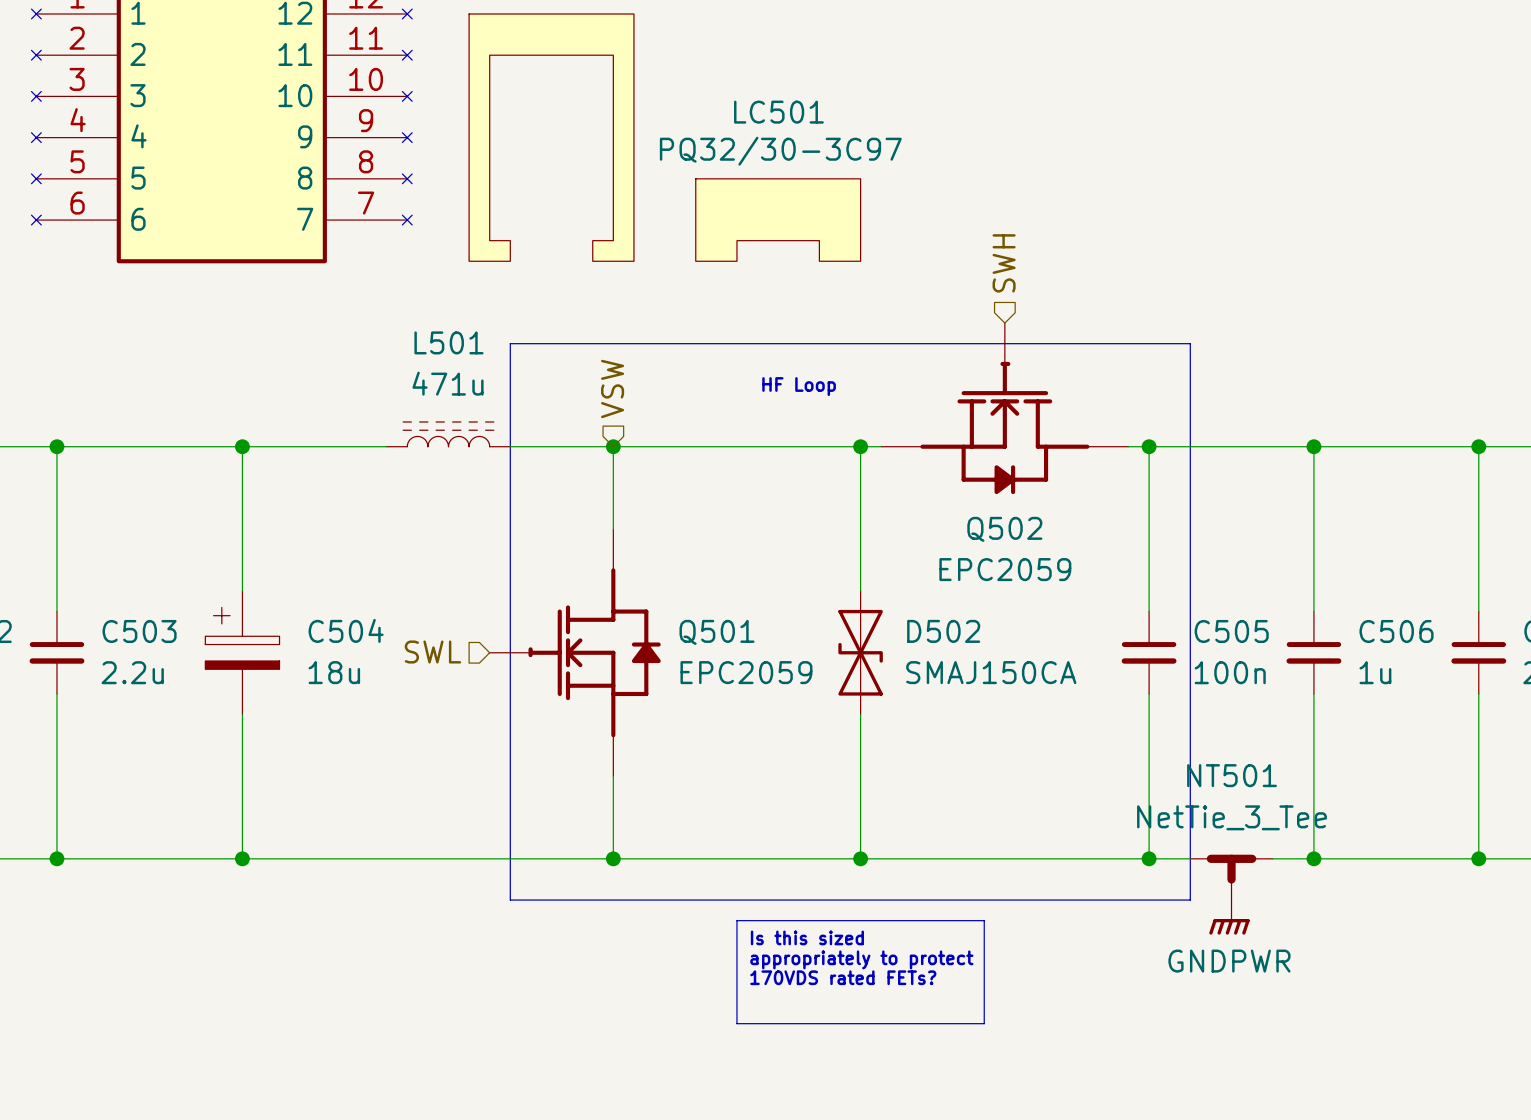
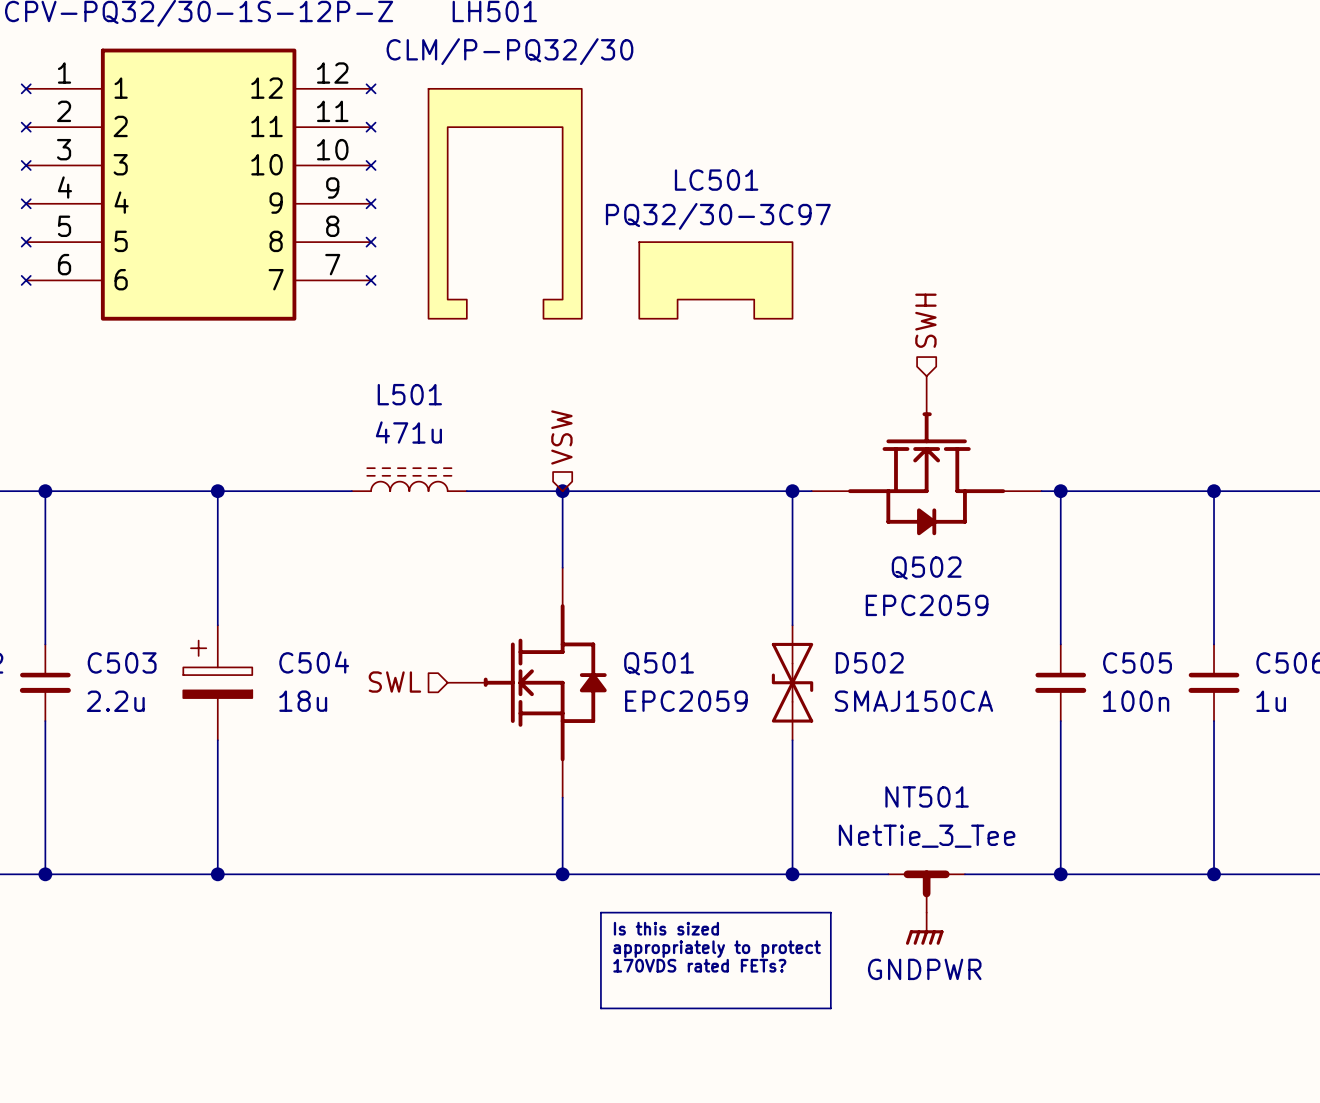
text: HF Loop (799, 386) -> none
NT501 position: (1231, 878) -> (926, 892)
line: (654, 900) (510, 900) (510, 343) (1190, 343) (1190, 900) (901, 900) -> (600, 912) (600, 1008) (830, 1008) (830, 912)
power symbol position: GNDPWR (1229, 917) -> GNDPWR (924, 928)
line: (736, 920) (984, 920) (984, 1023) (736, 1023) (736, 920) -> none
text position: Is this sized (807, 937) -> Is this sized (666, 928)
text position: appropriately to protect (861, 959) -> appropriately to protect (717, 949)
text position: 170VDS rated FETs? (843, 977) -> 170VDS rated FETs? (699, 965)

